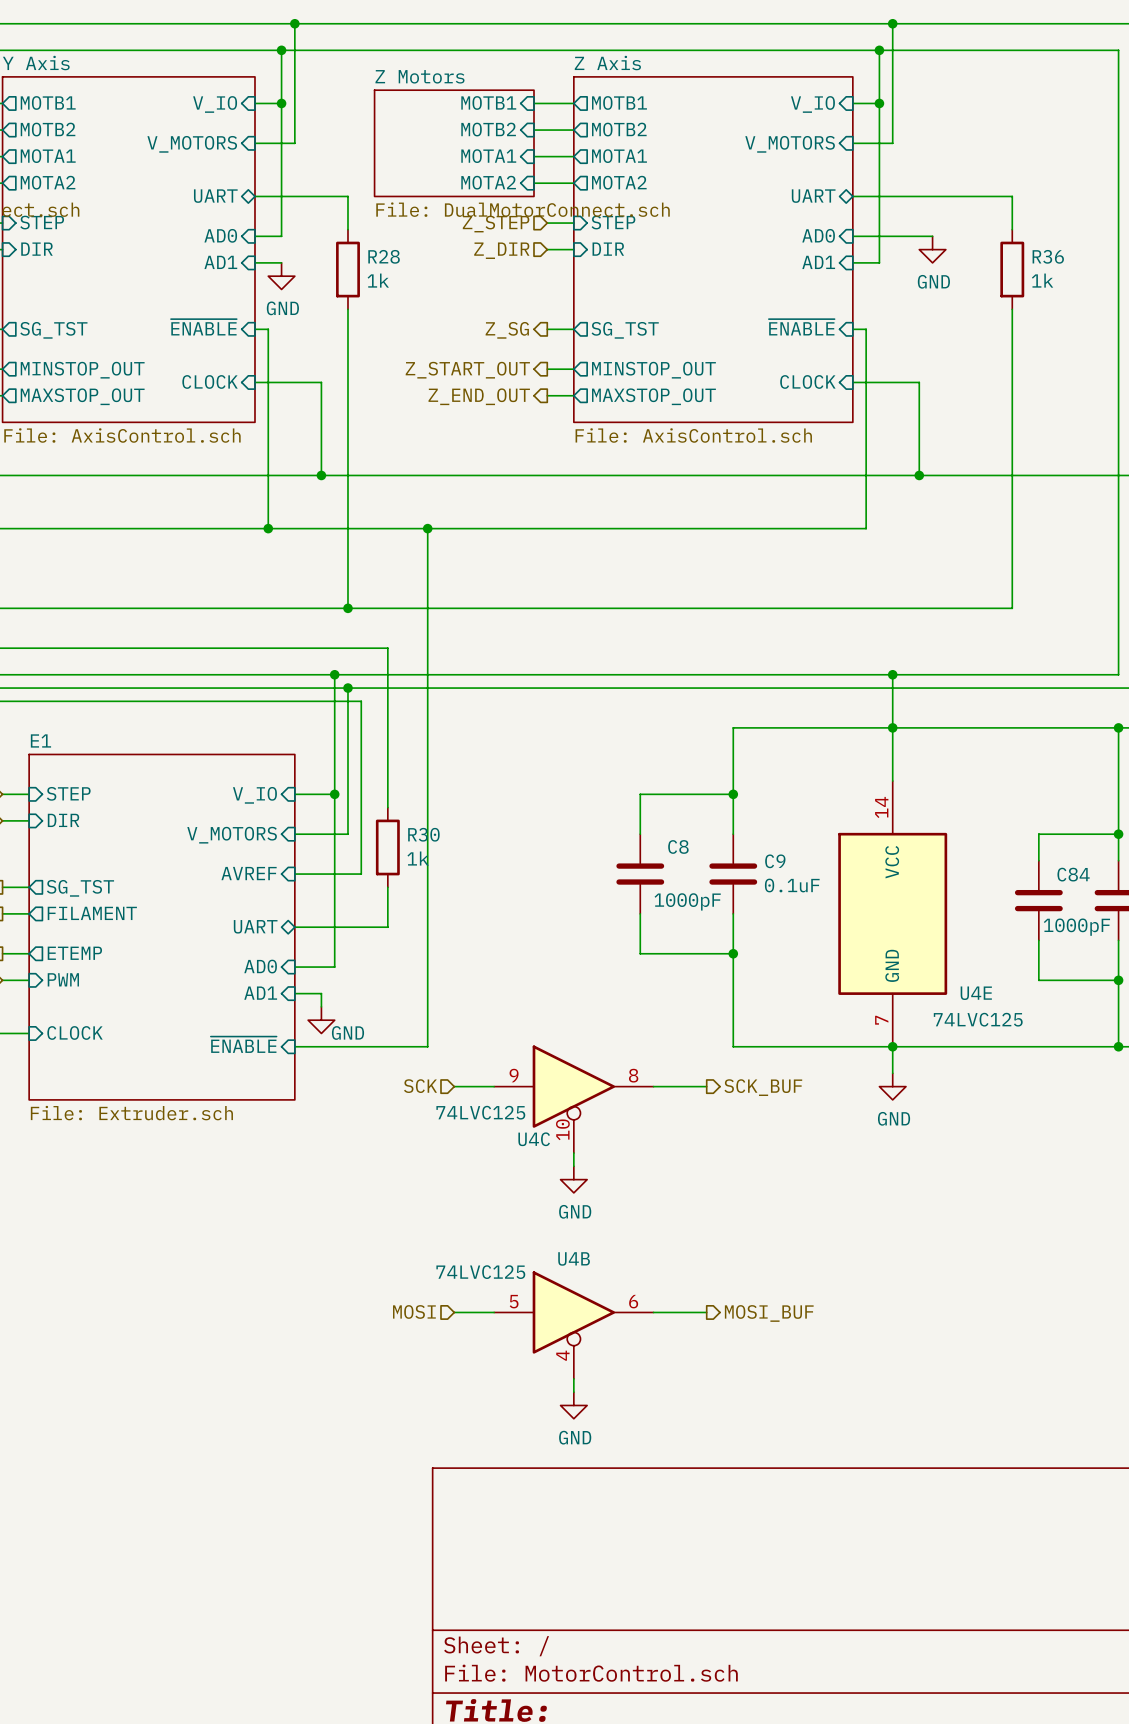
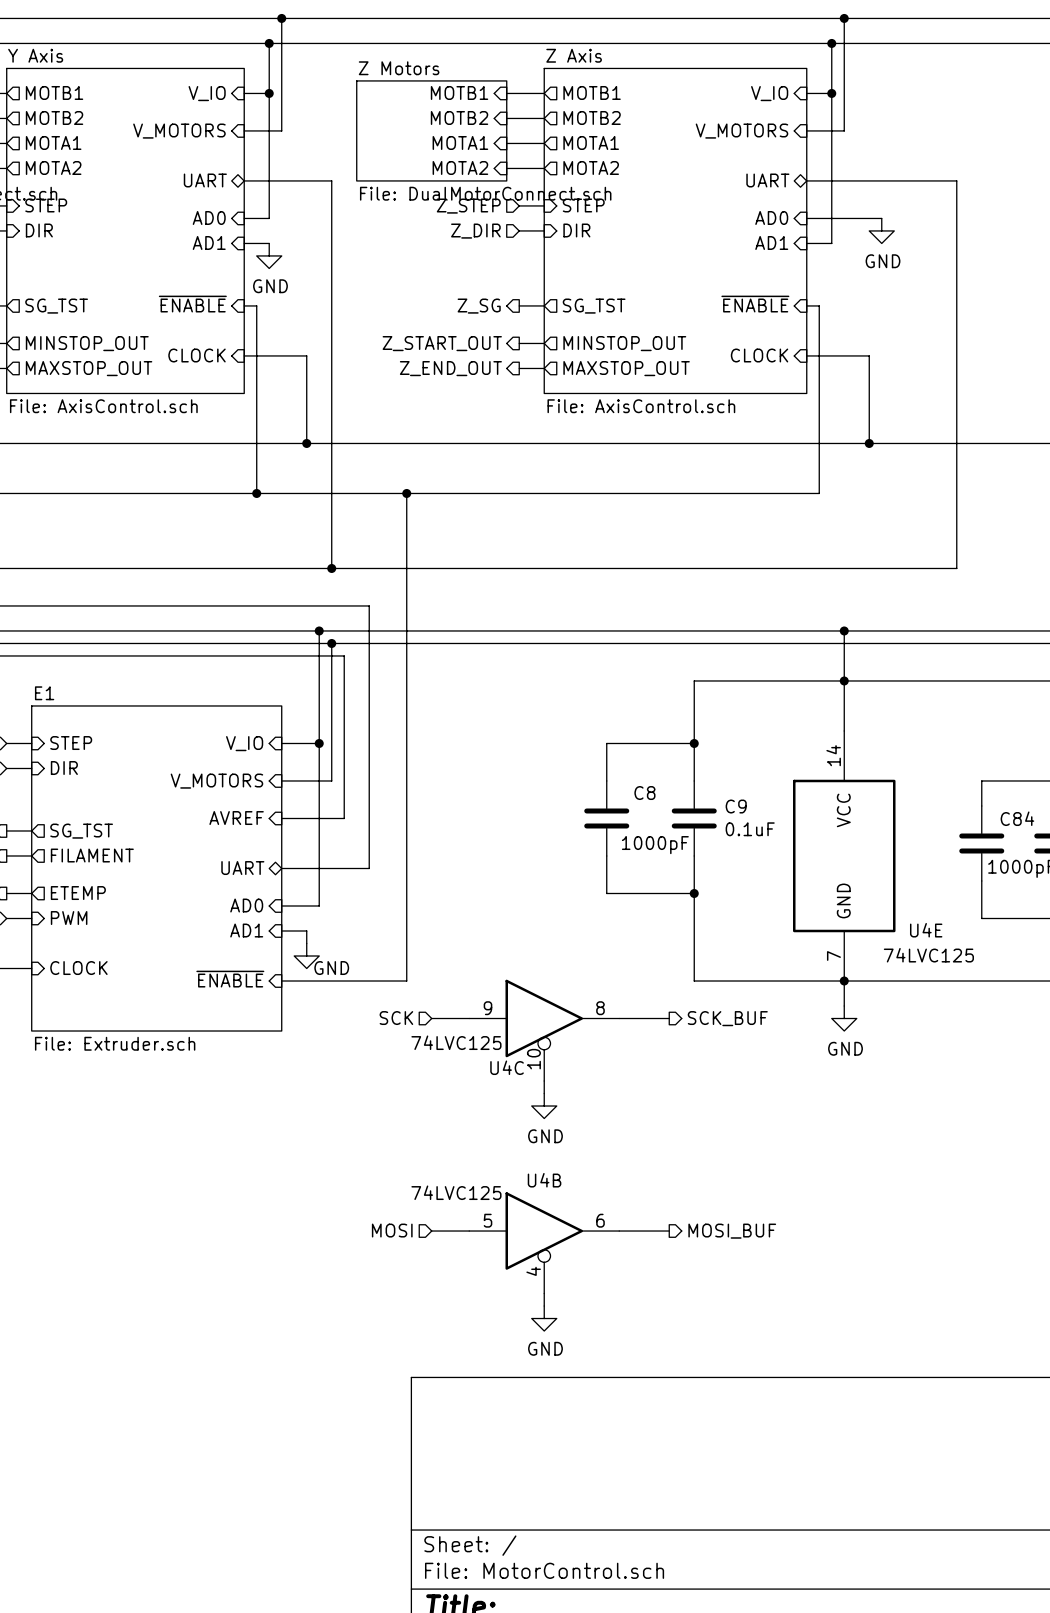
wire: none -> (331, 212) (331, 287)
wire: none -> (956, 212) (956, 287)
R28: 1k (347, 269) -> none
R36: 1k (1012, 269) -> none
wire: none -> (369, 755) (369, 830)
R30: 1k (387, 847) -> none

